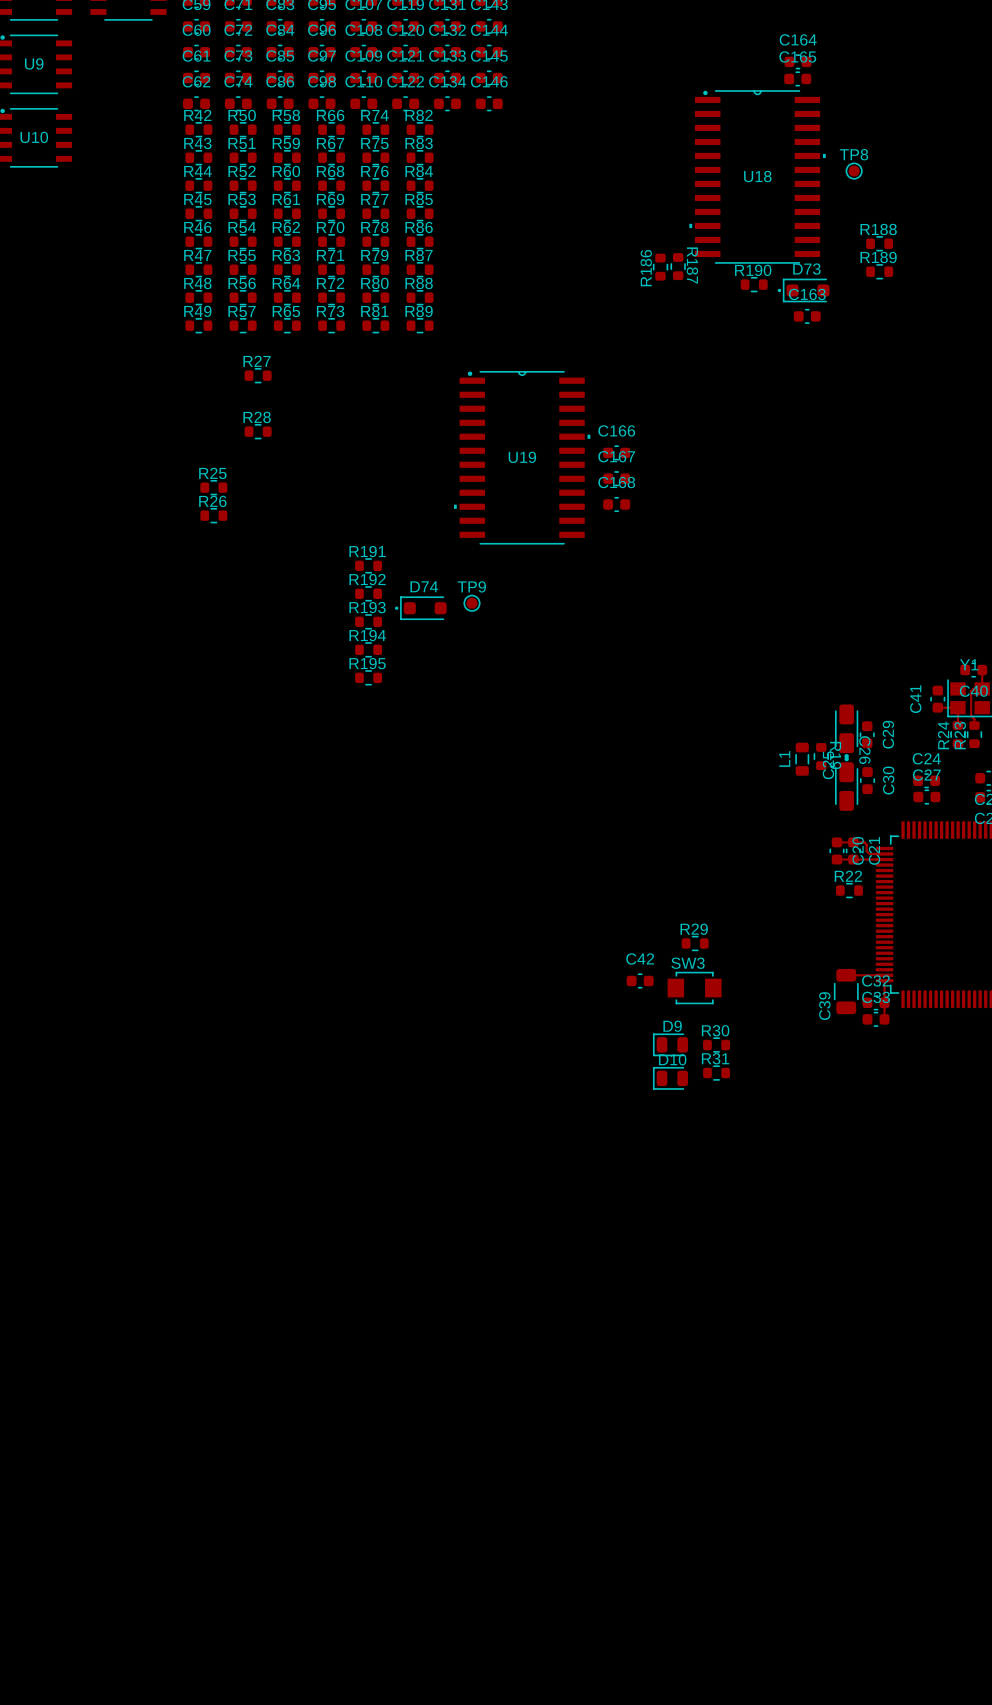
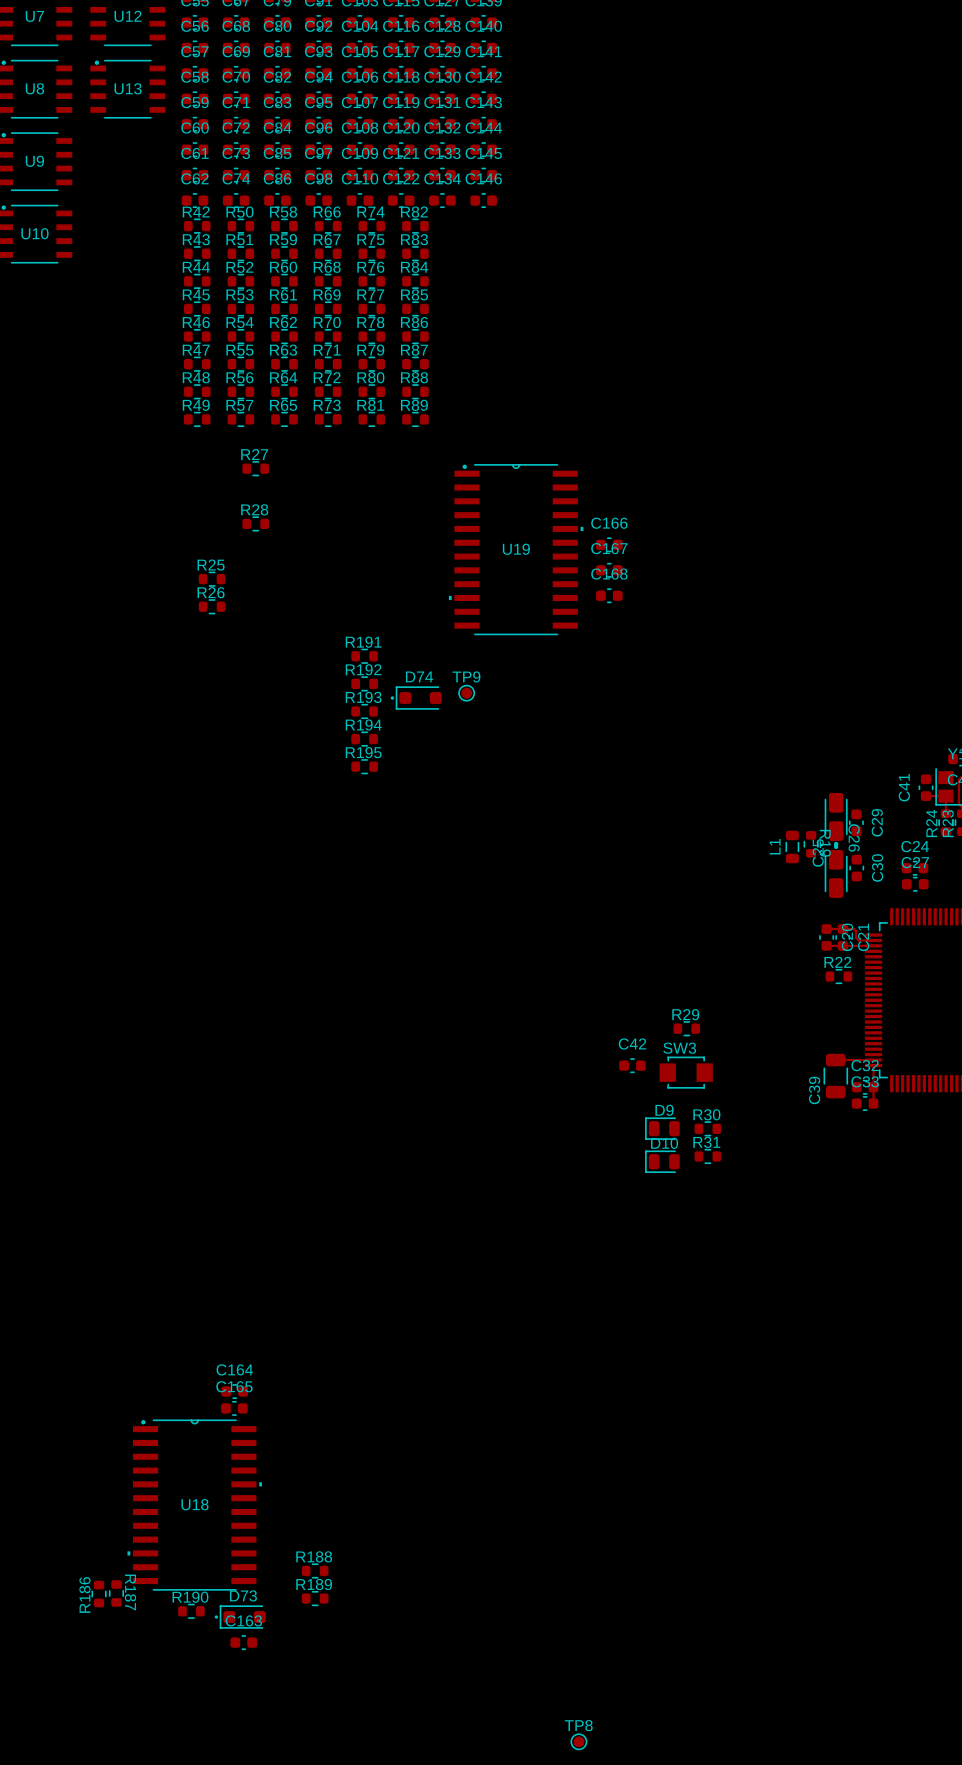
C164 position: (798, 61) -> (234, 1391)
C165 position: (797, 78) -> (234, 1408)
TP8 position: (854, 171) -> (578, 1741)
U18 position: (757, 176) -> (194, 1505)
R188 position: (879, 243) -> (315, 1570)
R187 position: (678, 266) -> (116, 1593)
R186 position: (660, 267) -> (99, 1594)
R189 position: (879, 271) -> (315, 1598)
R190 position: (754, 284) -> (191, 1611)
D73 position: (803, 290) -> (240, 1617)
C163 position: (807, 316) -> (243, 1642)

